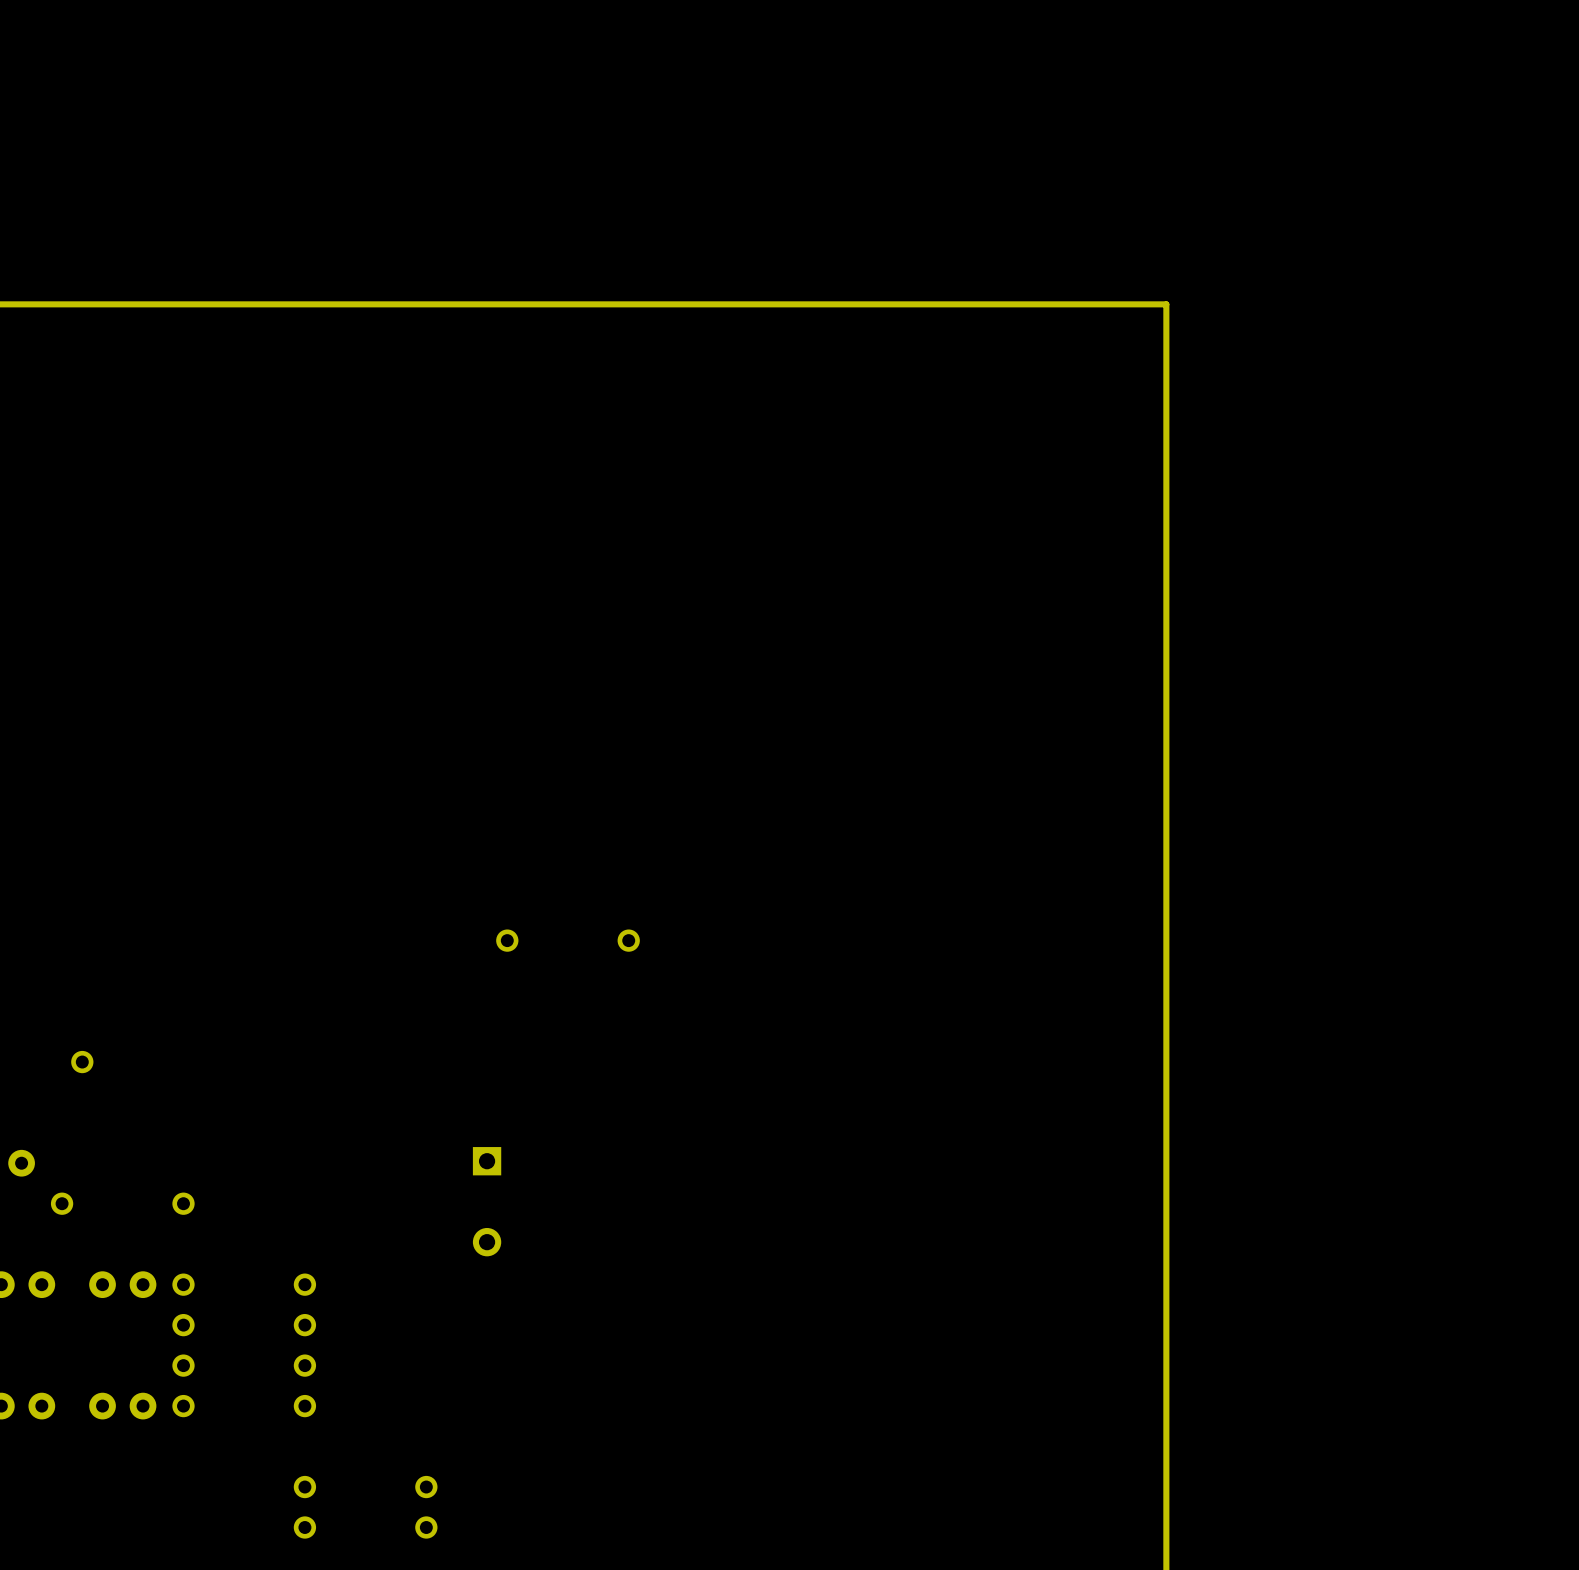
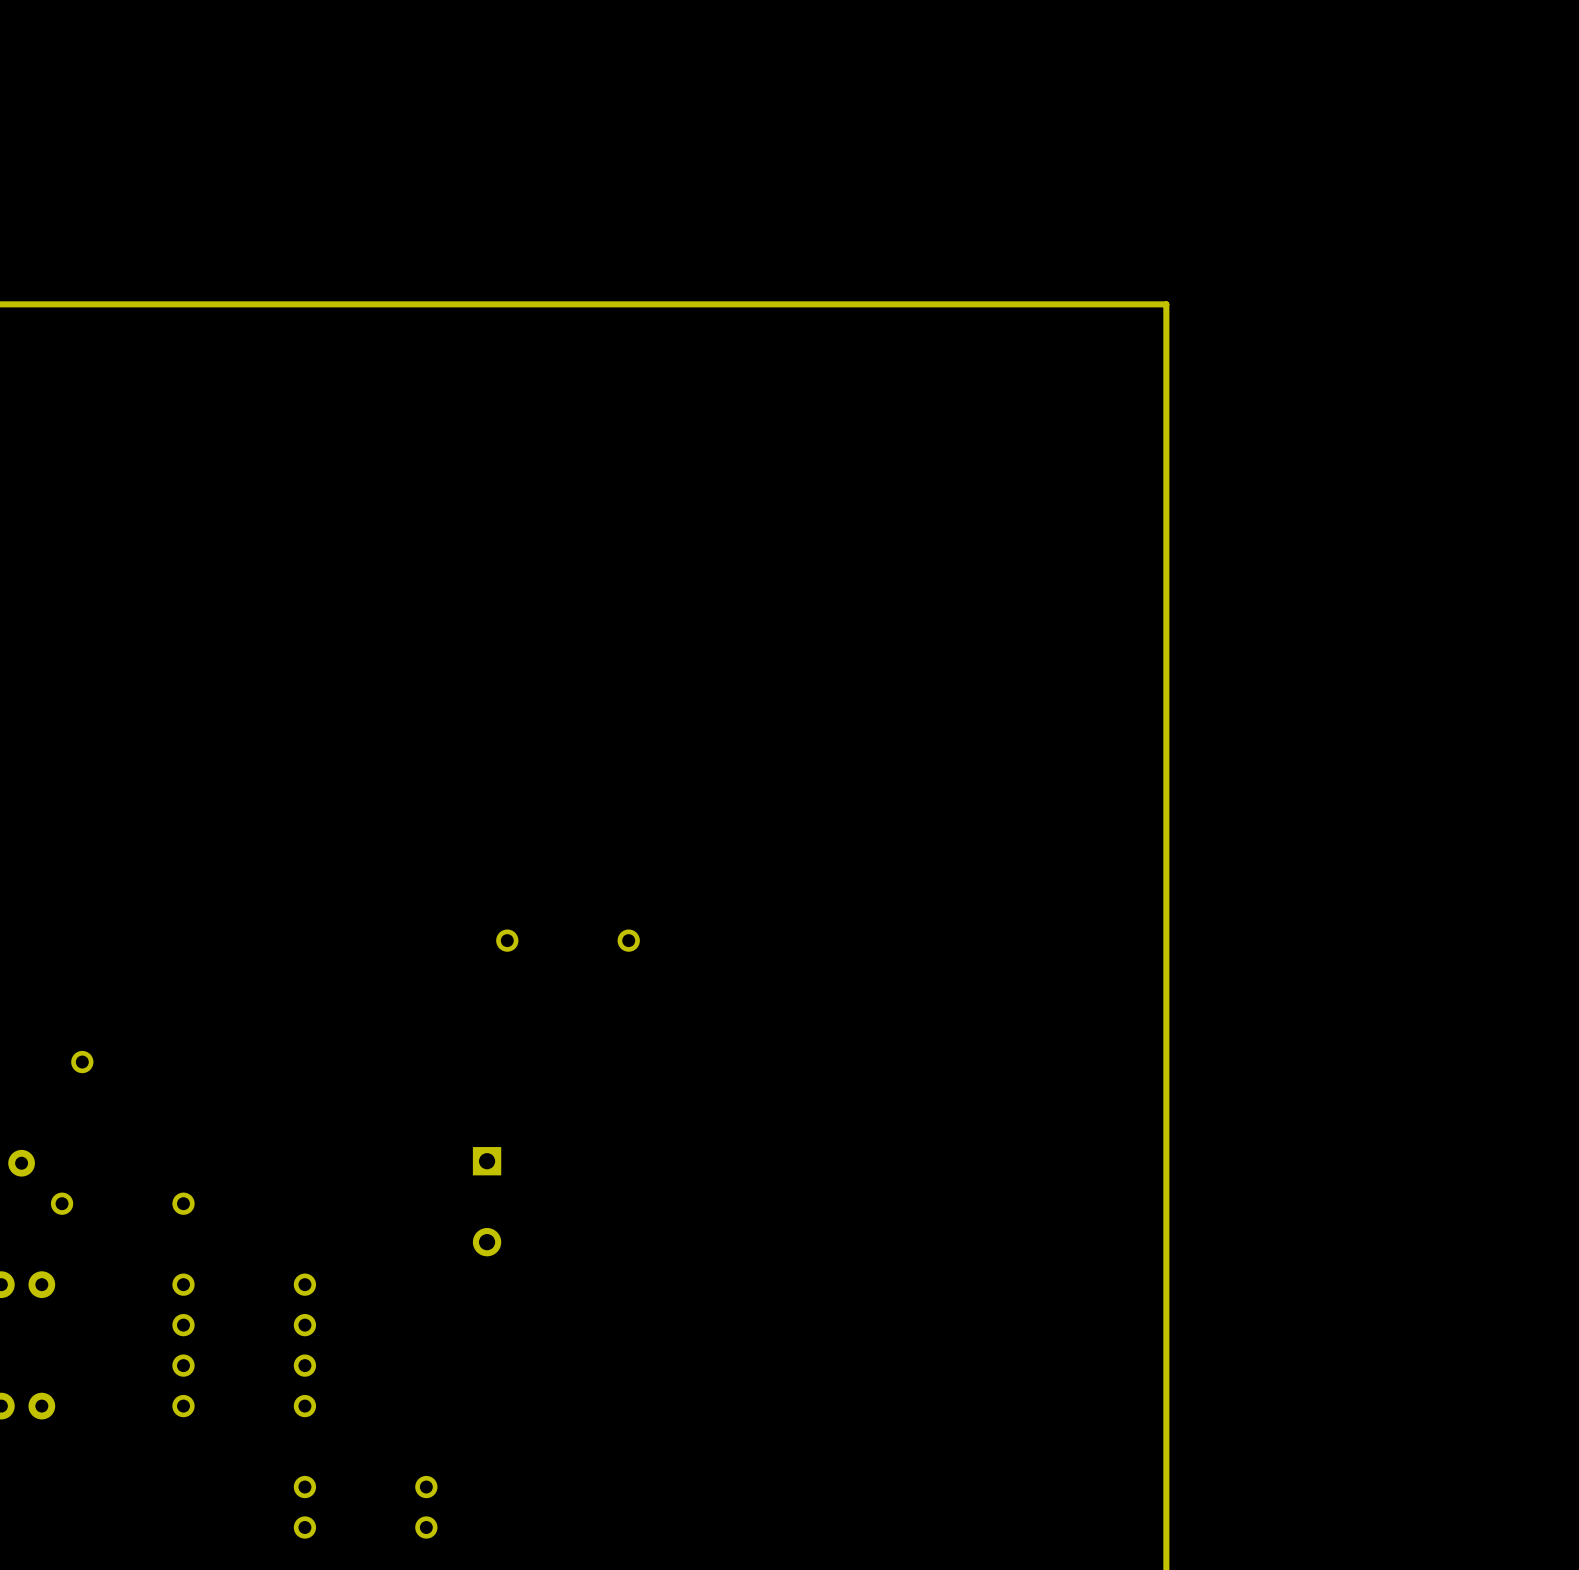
part: (122, 1284) -> none
part: (122, 1406) -> none

